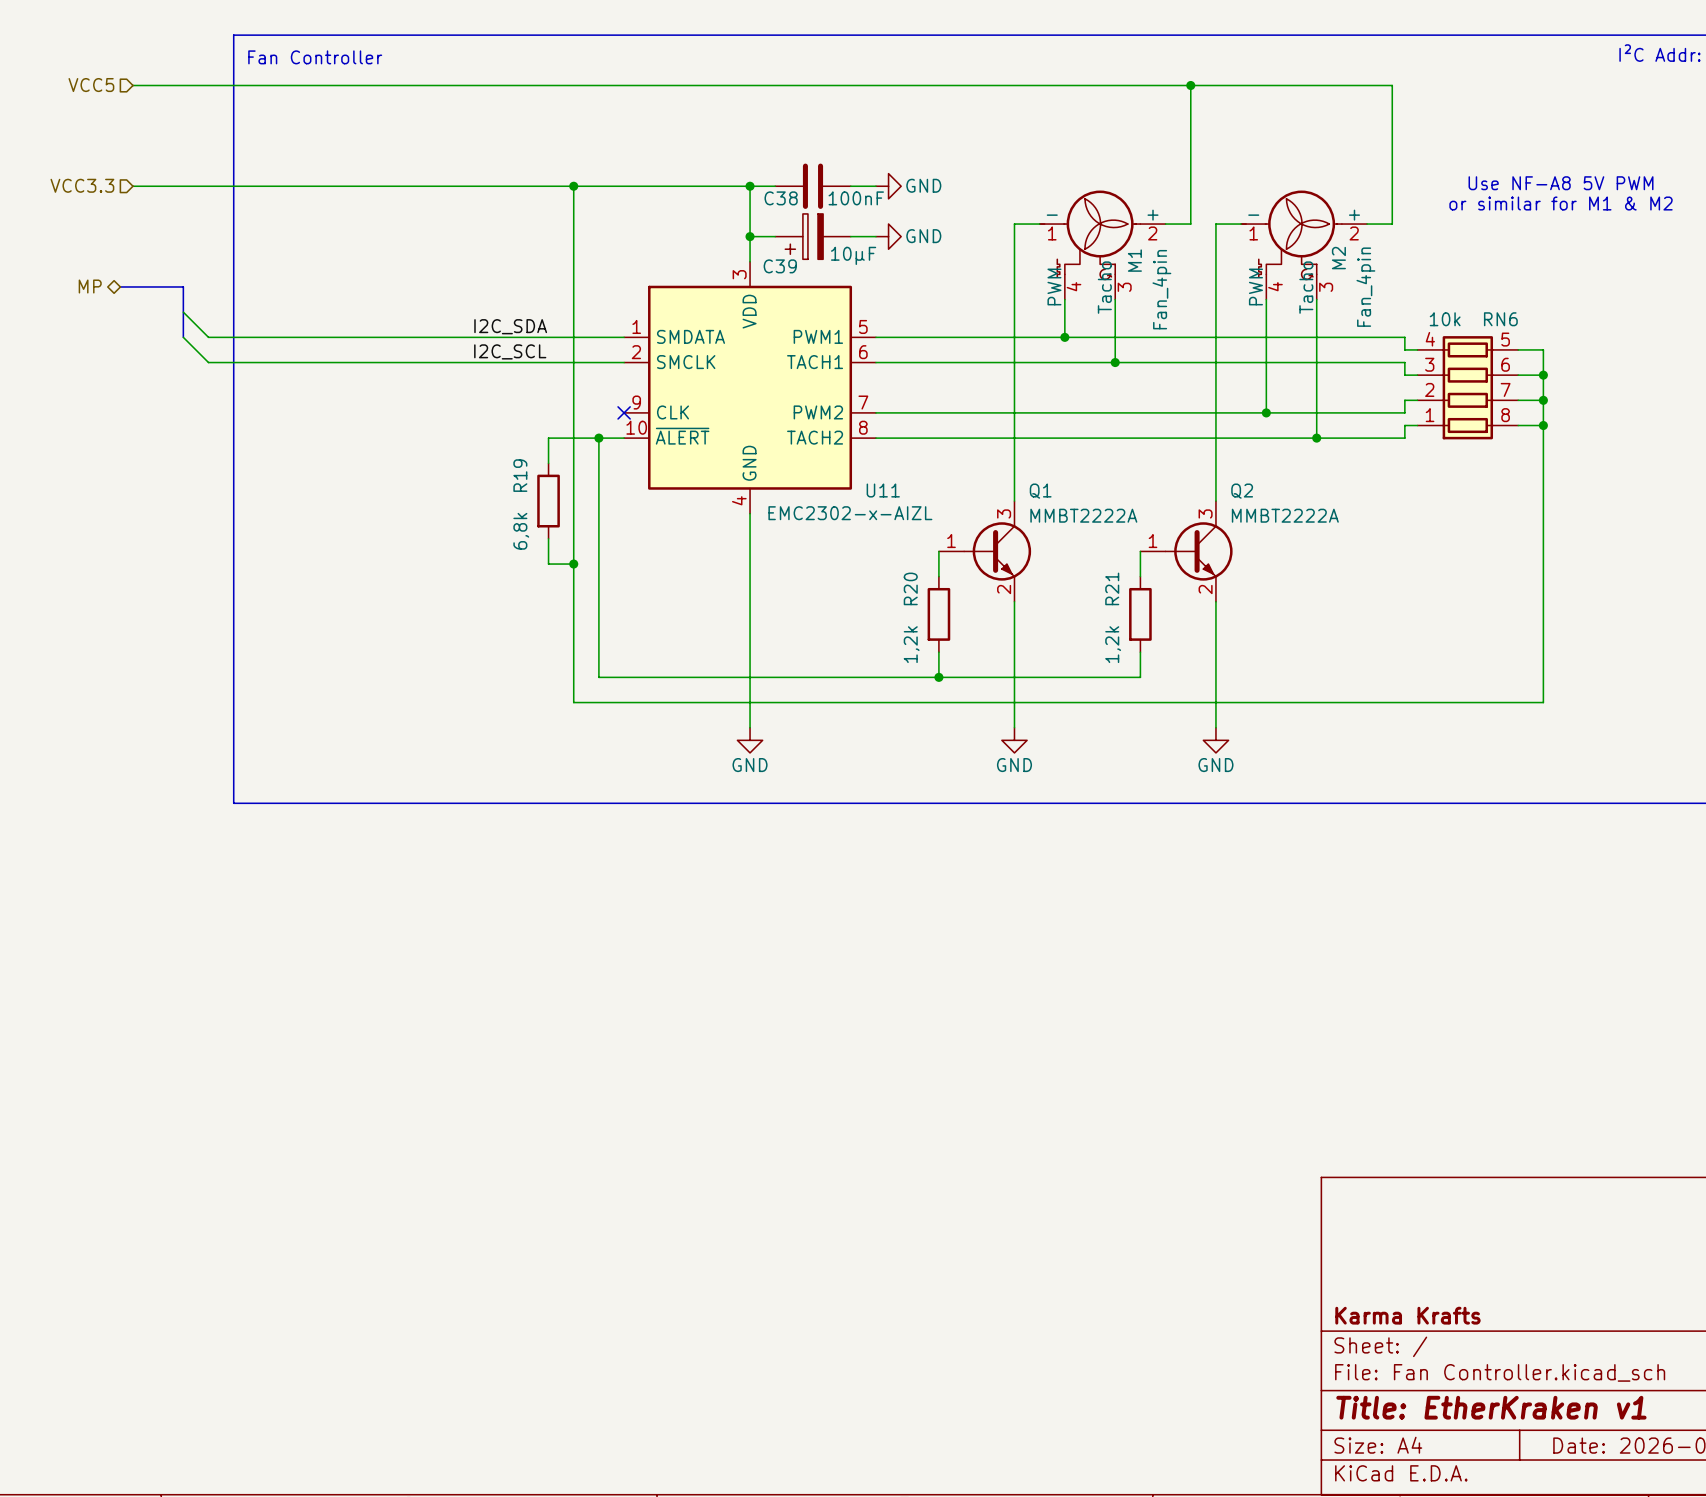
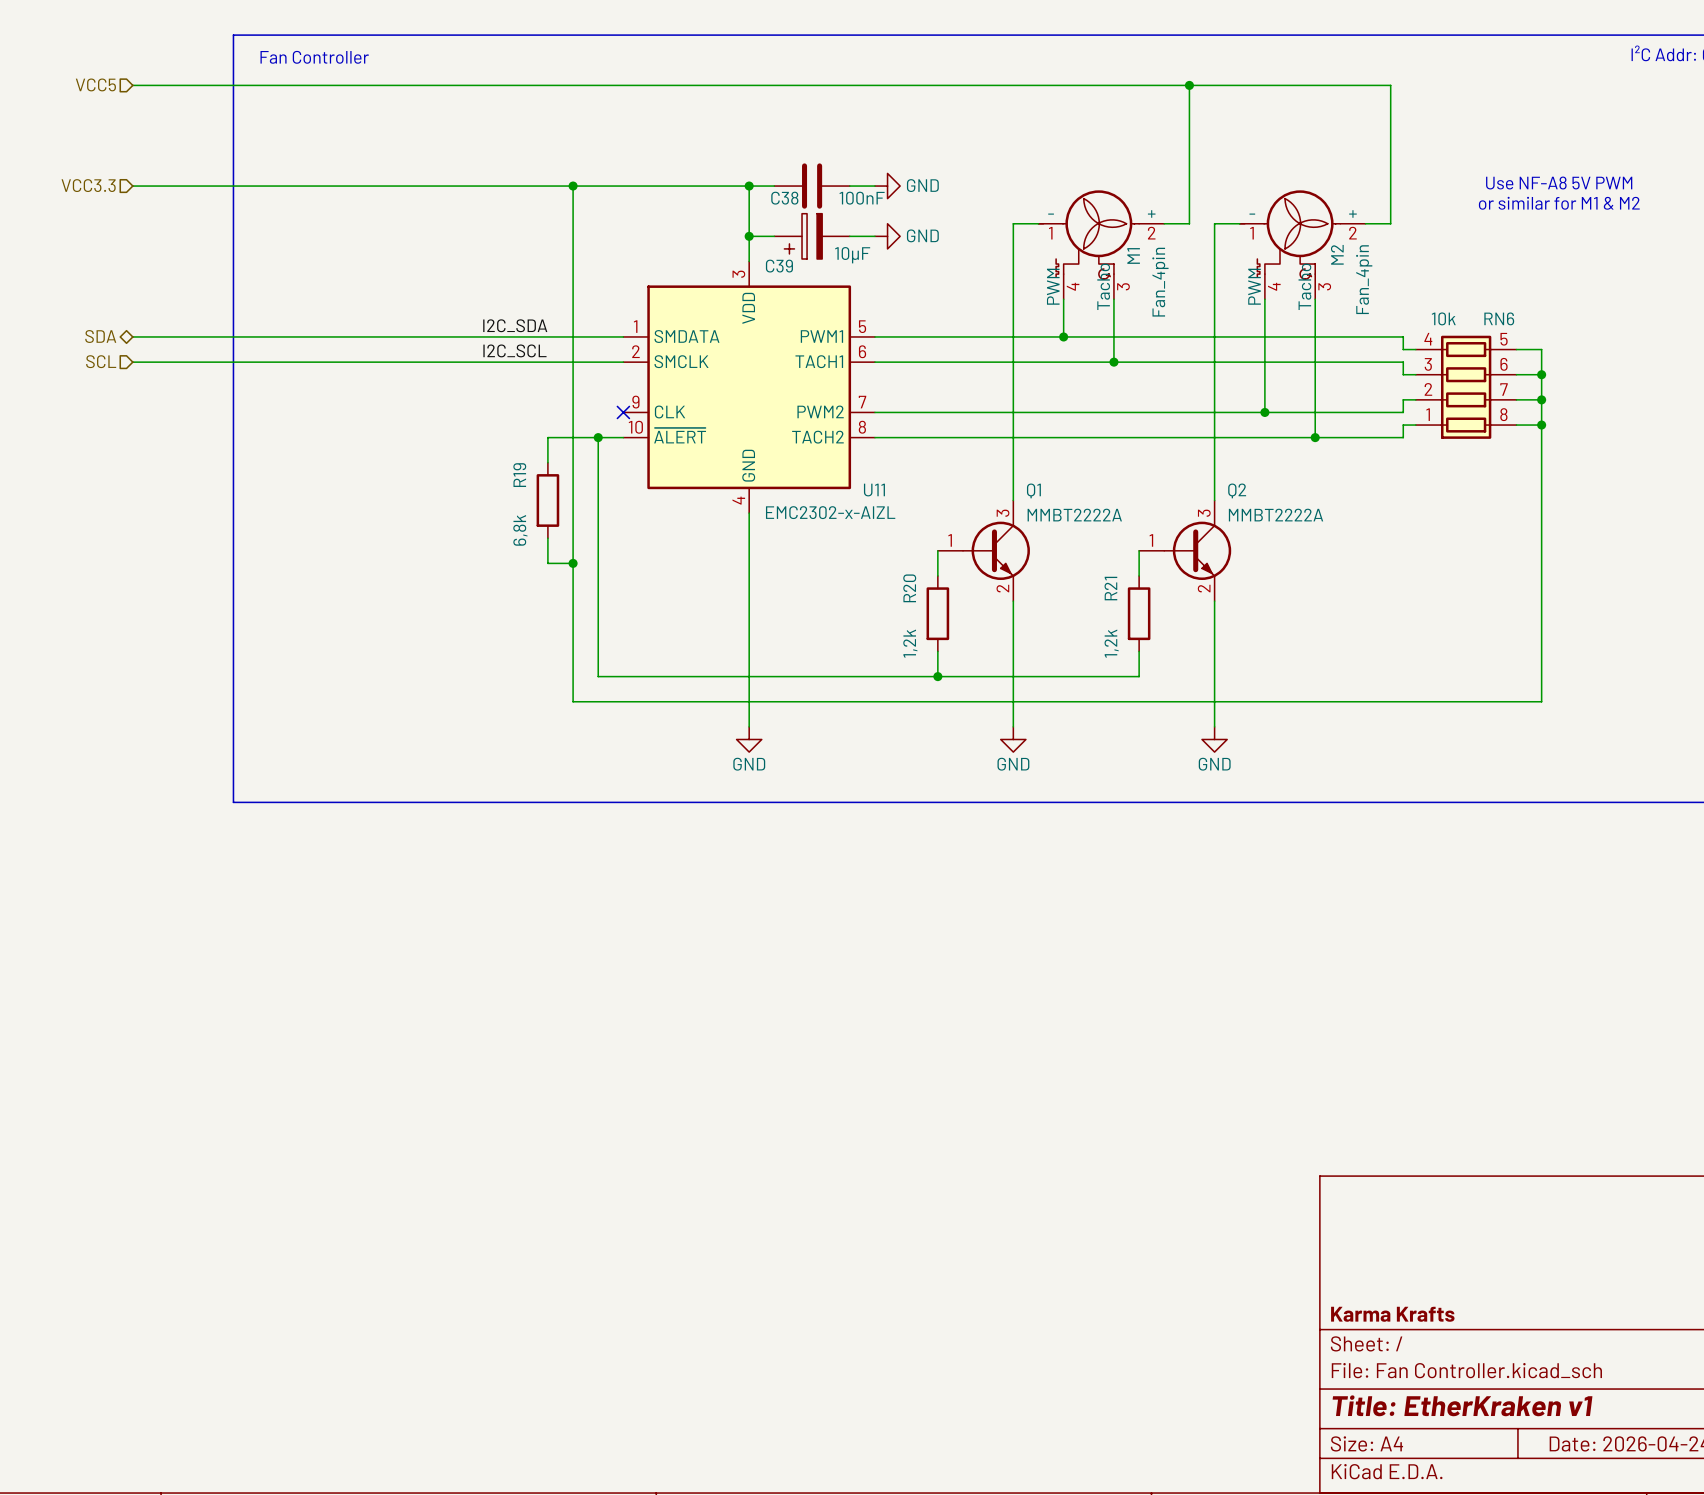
hierarchical label: MP (90, 286) -> none
bus: (120, 286) (183, 286) (183, 337) -> none
wire: (183, 312) (208, 337) -> (132, 336) (208, 336)
hierarchical label: none -> SDA (100, 336)
wire: (183, 337) (208, 362) -> (132, 362) (208, 362)
hierarchical label: none -> SCL (101, 361)

